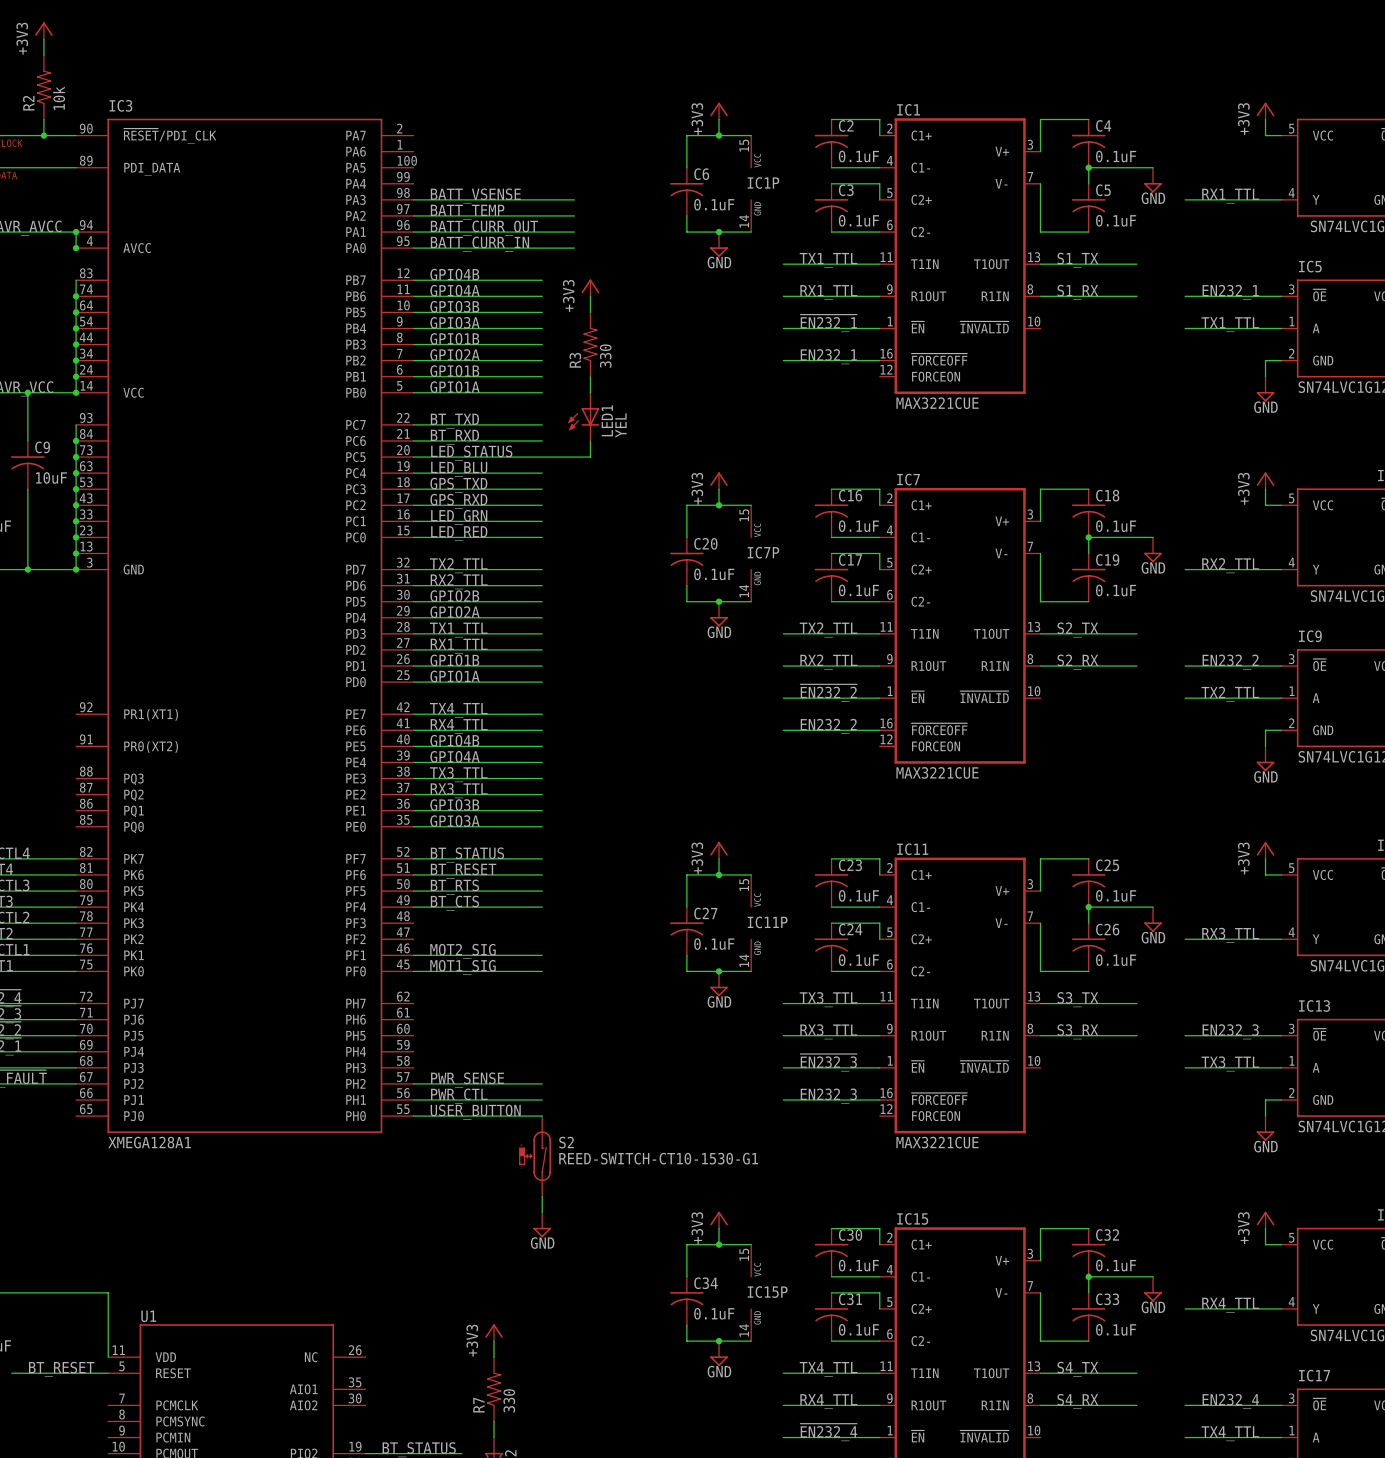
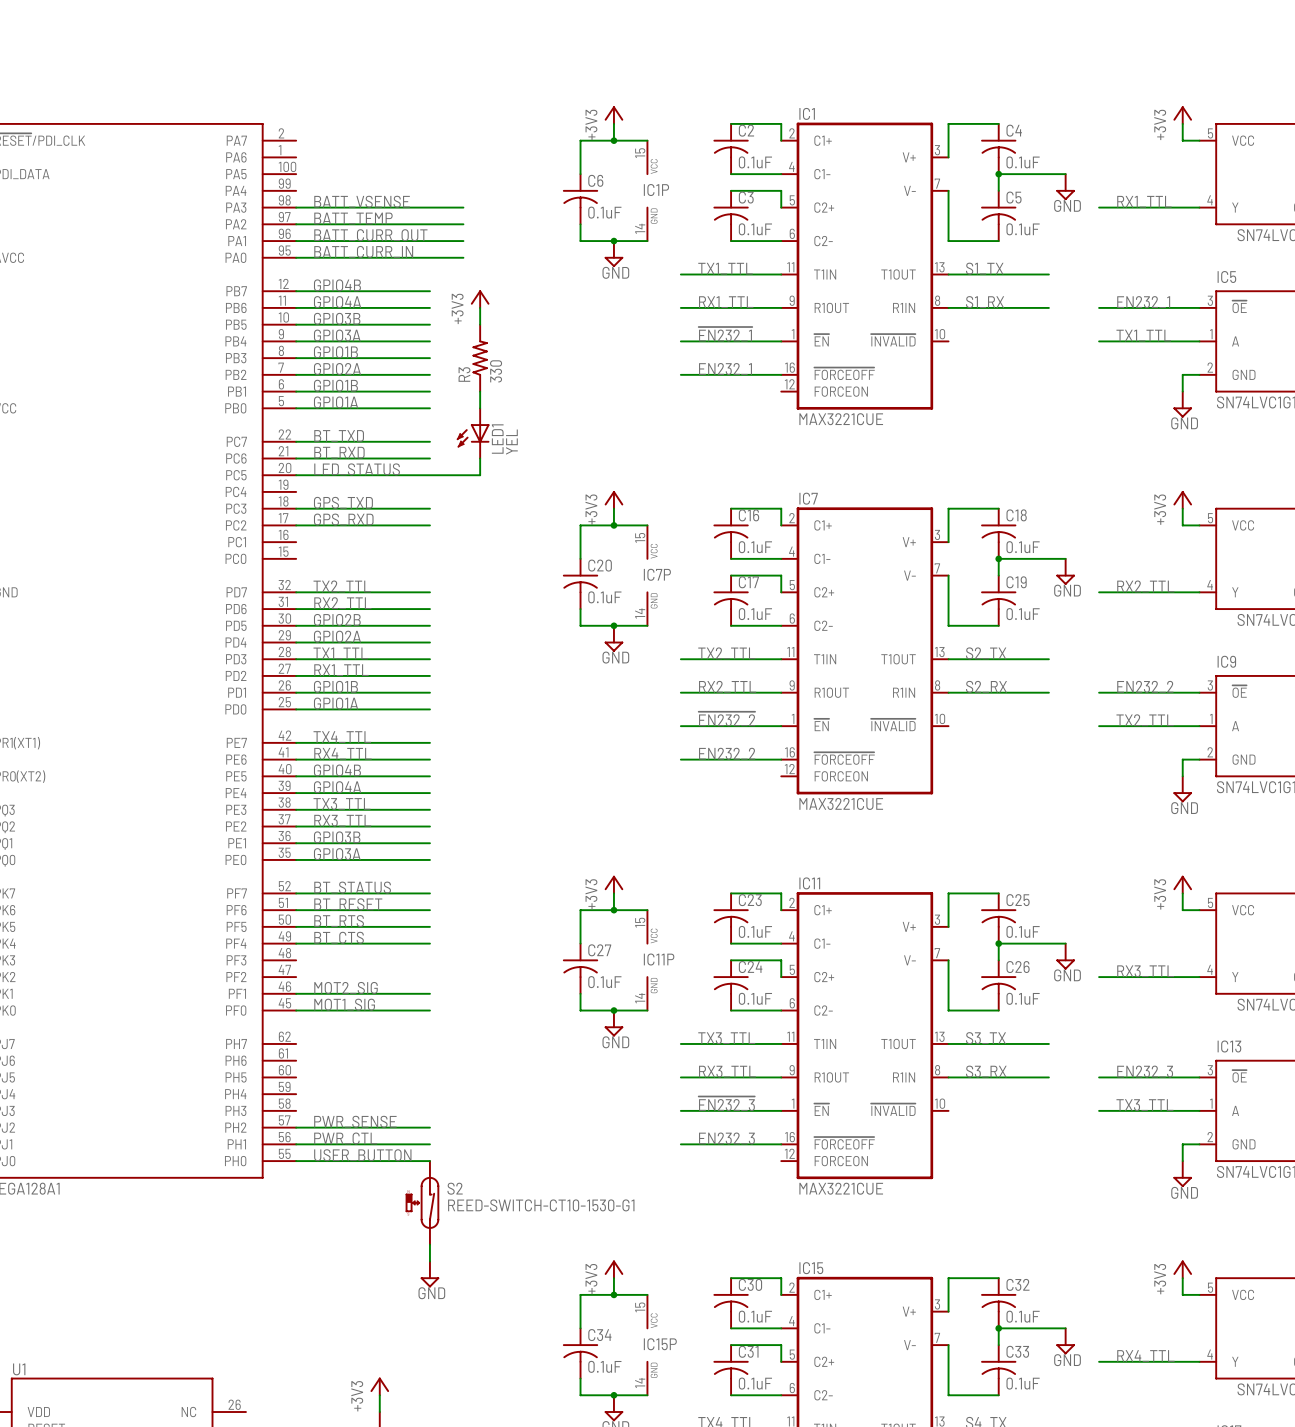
label: LED_BLU (459, 469) -> none
wire: (413, 473) (542, 473) -> none
label: LED_GRN (459, 517) -> none
wire: (413, 521) (542, 521) -> none
label: LED_RED (459, 533) -> none
wire: (413, 537) (542, 537) -> none

